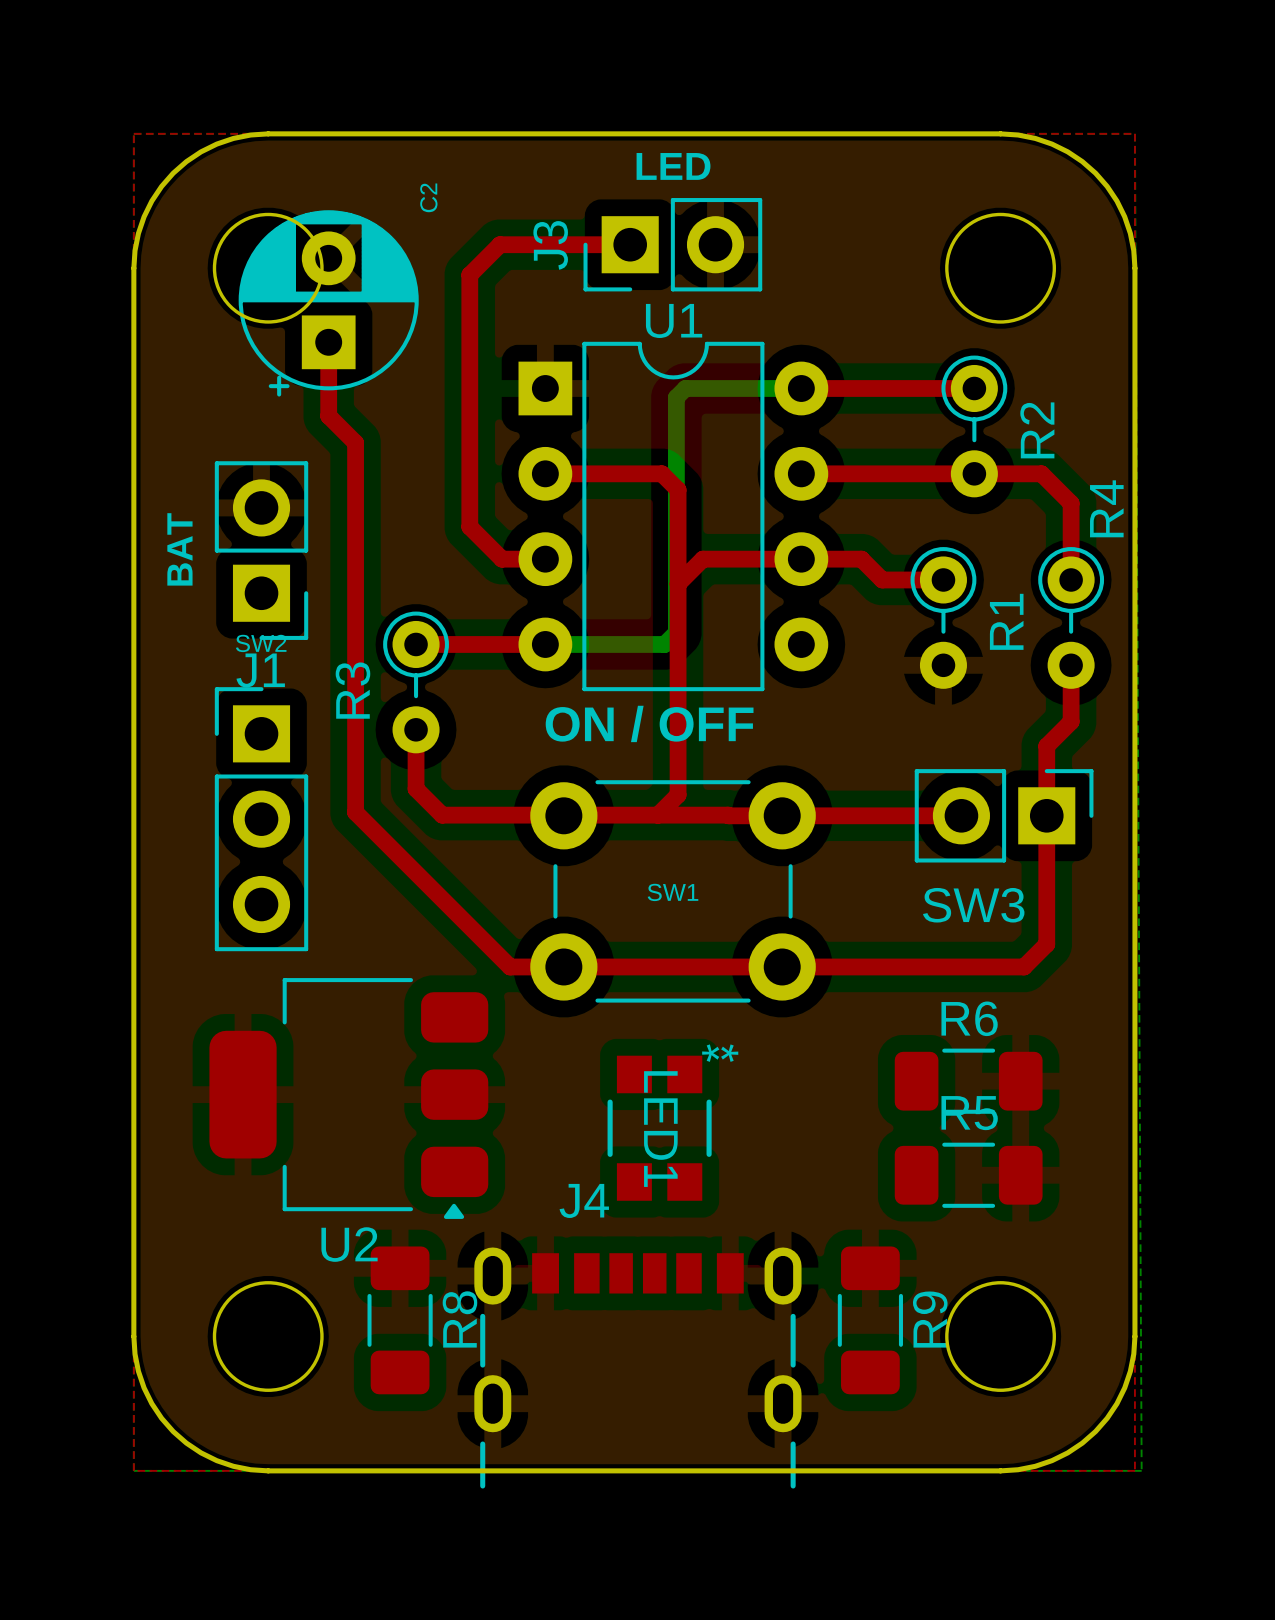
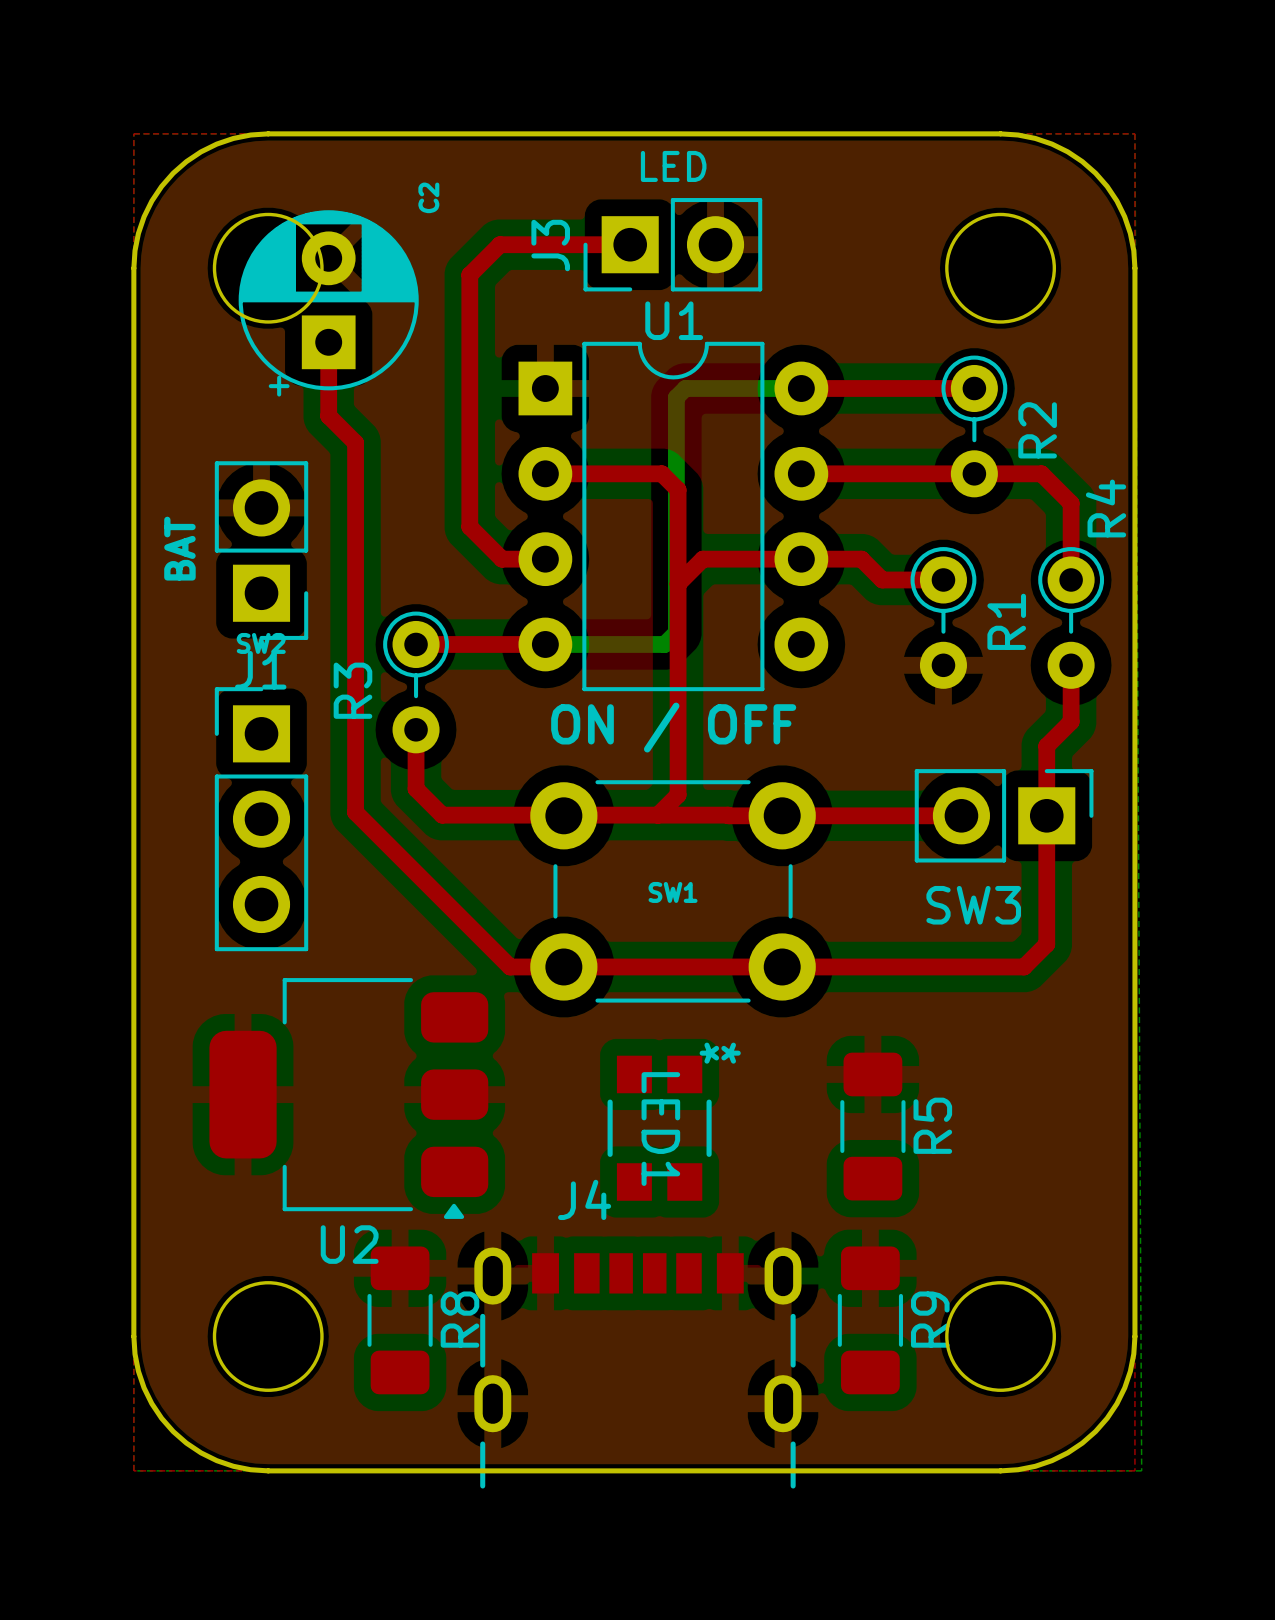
R6: (968, 1081) -> none
R5 rotation: 0° (968, 1175) -> 90° clockwise (872, 1126)
R5 position: (968, 1175) -> (872, 1126)

